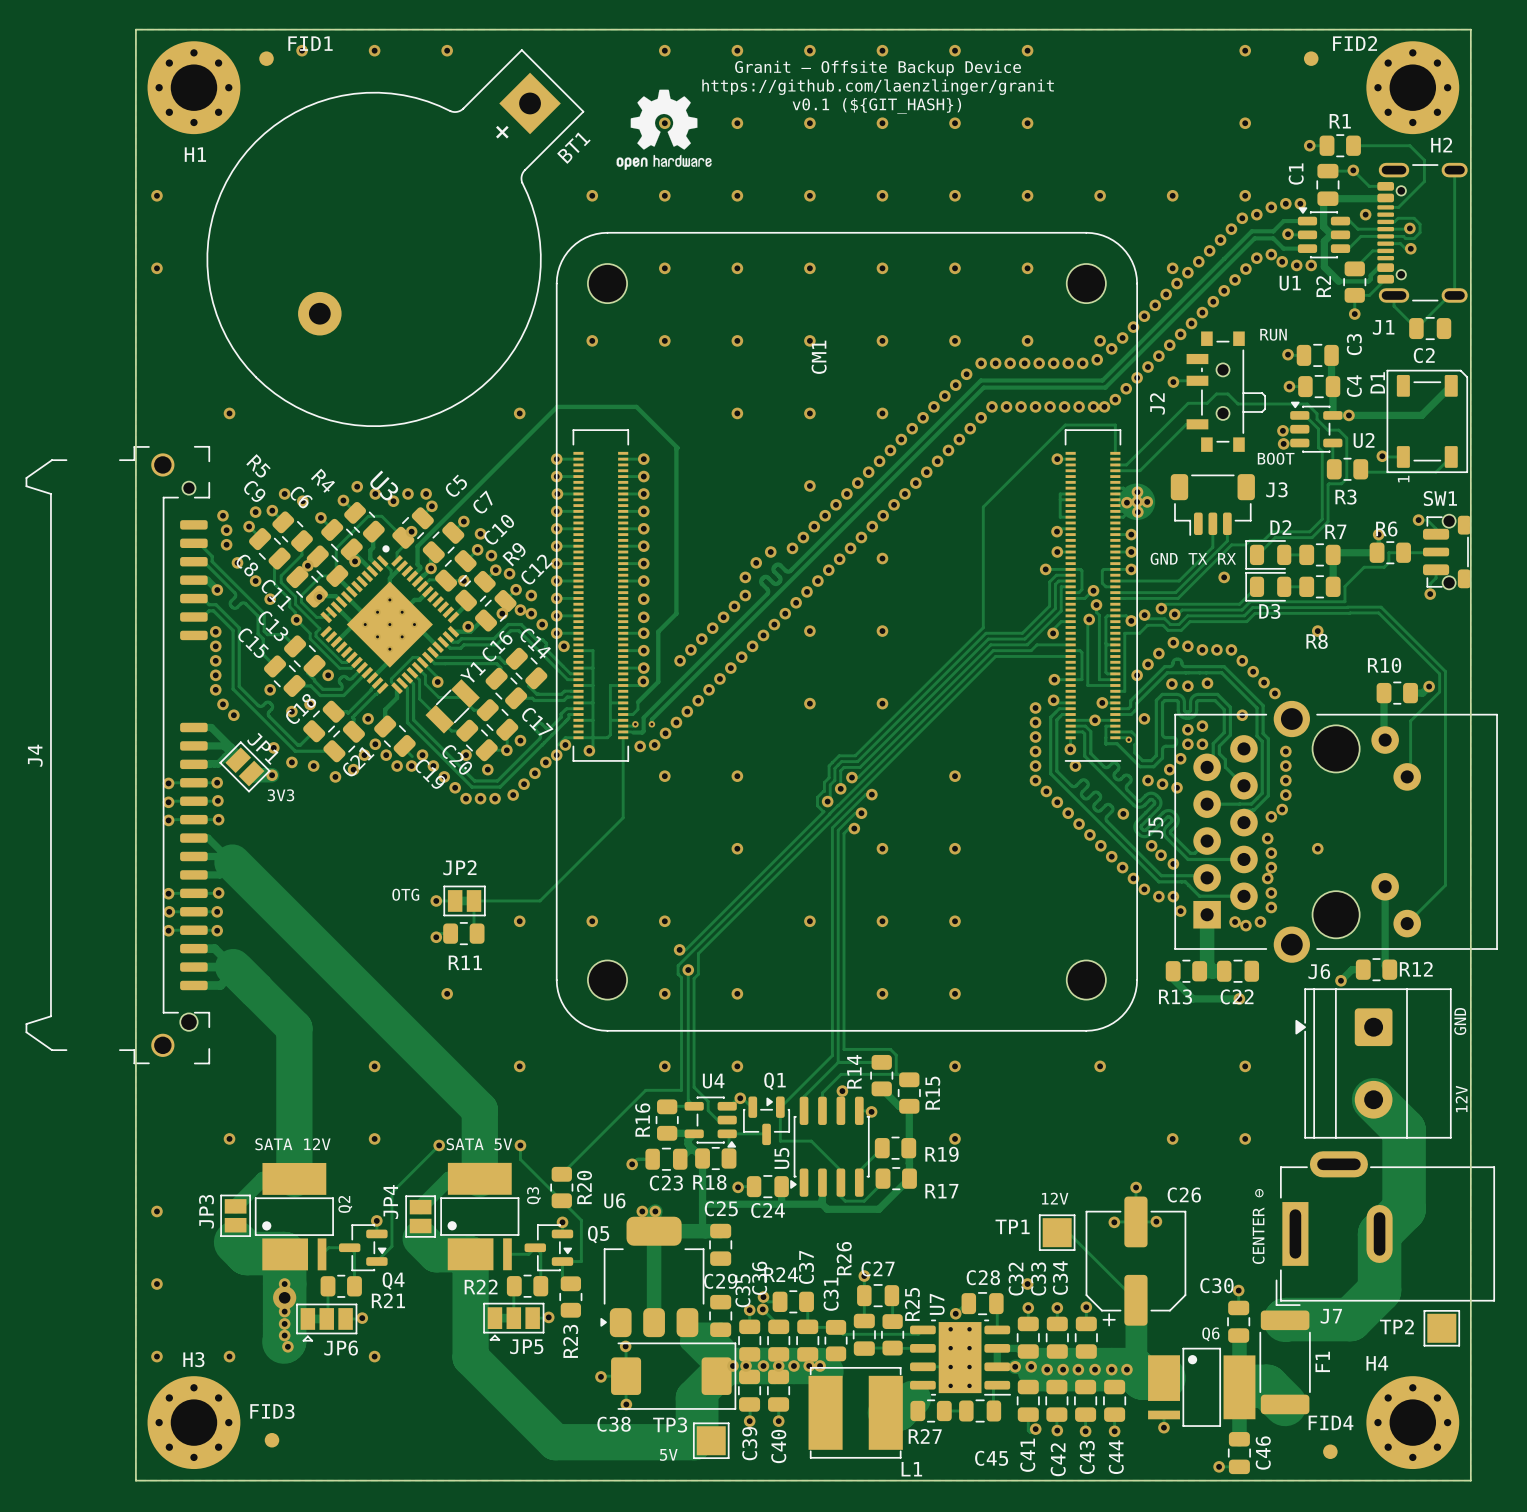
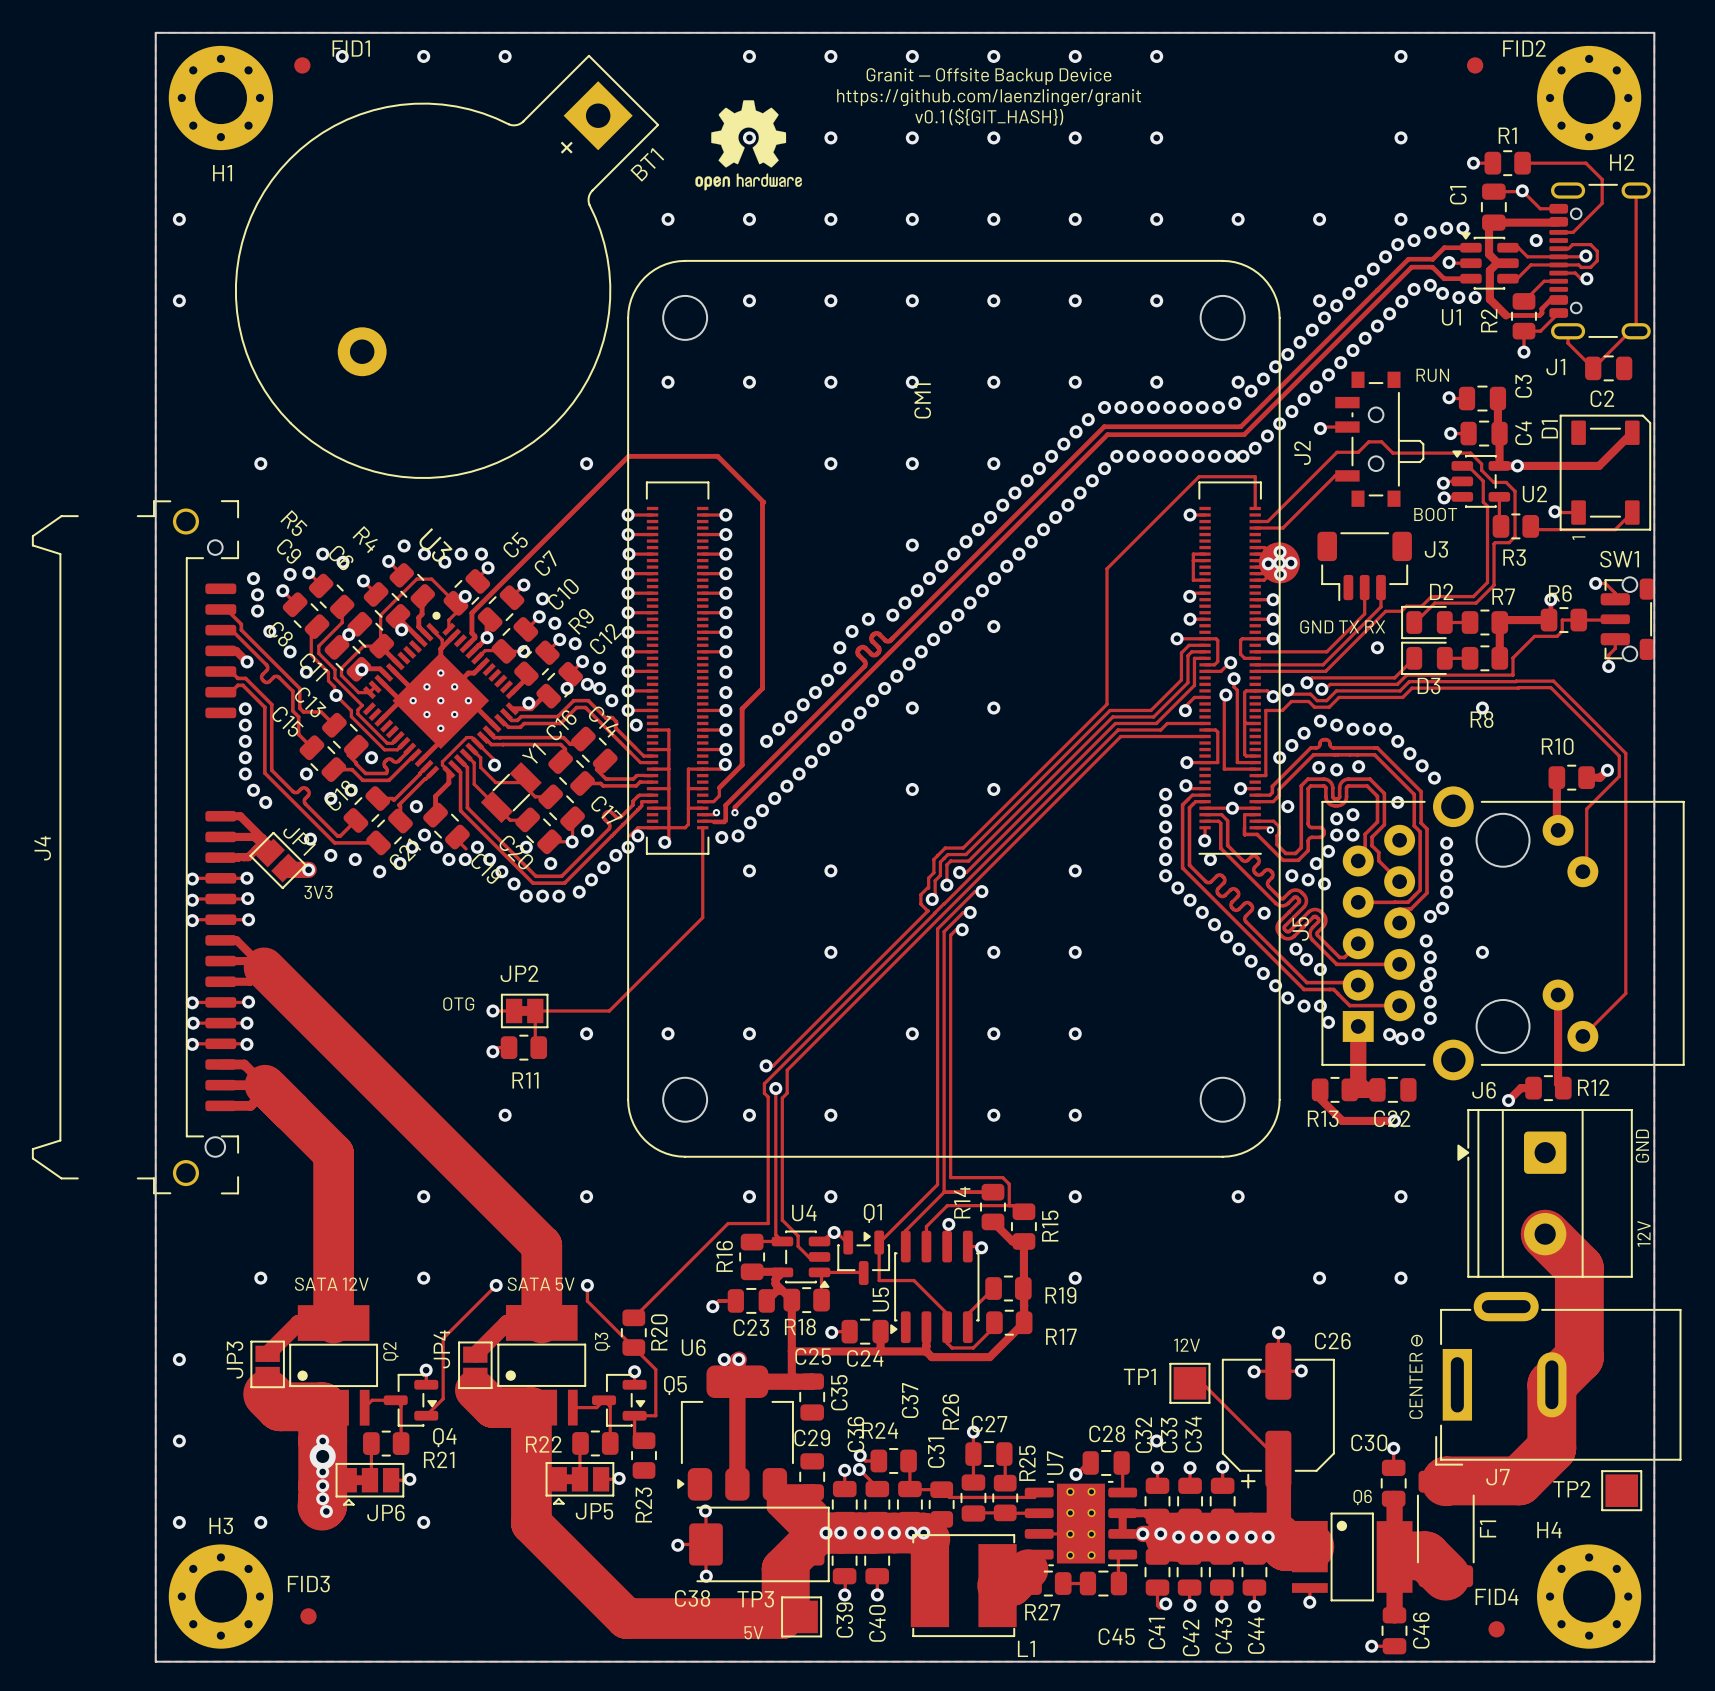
C37 name position: C37 (806, 1267) -> C37 (910, 1400)
C35 name position: C35 (742, 1290) -> C35 (839, 1392)

